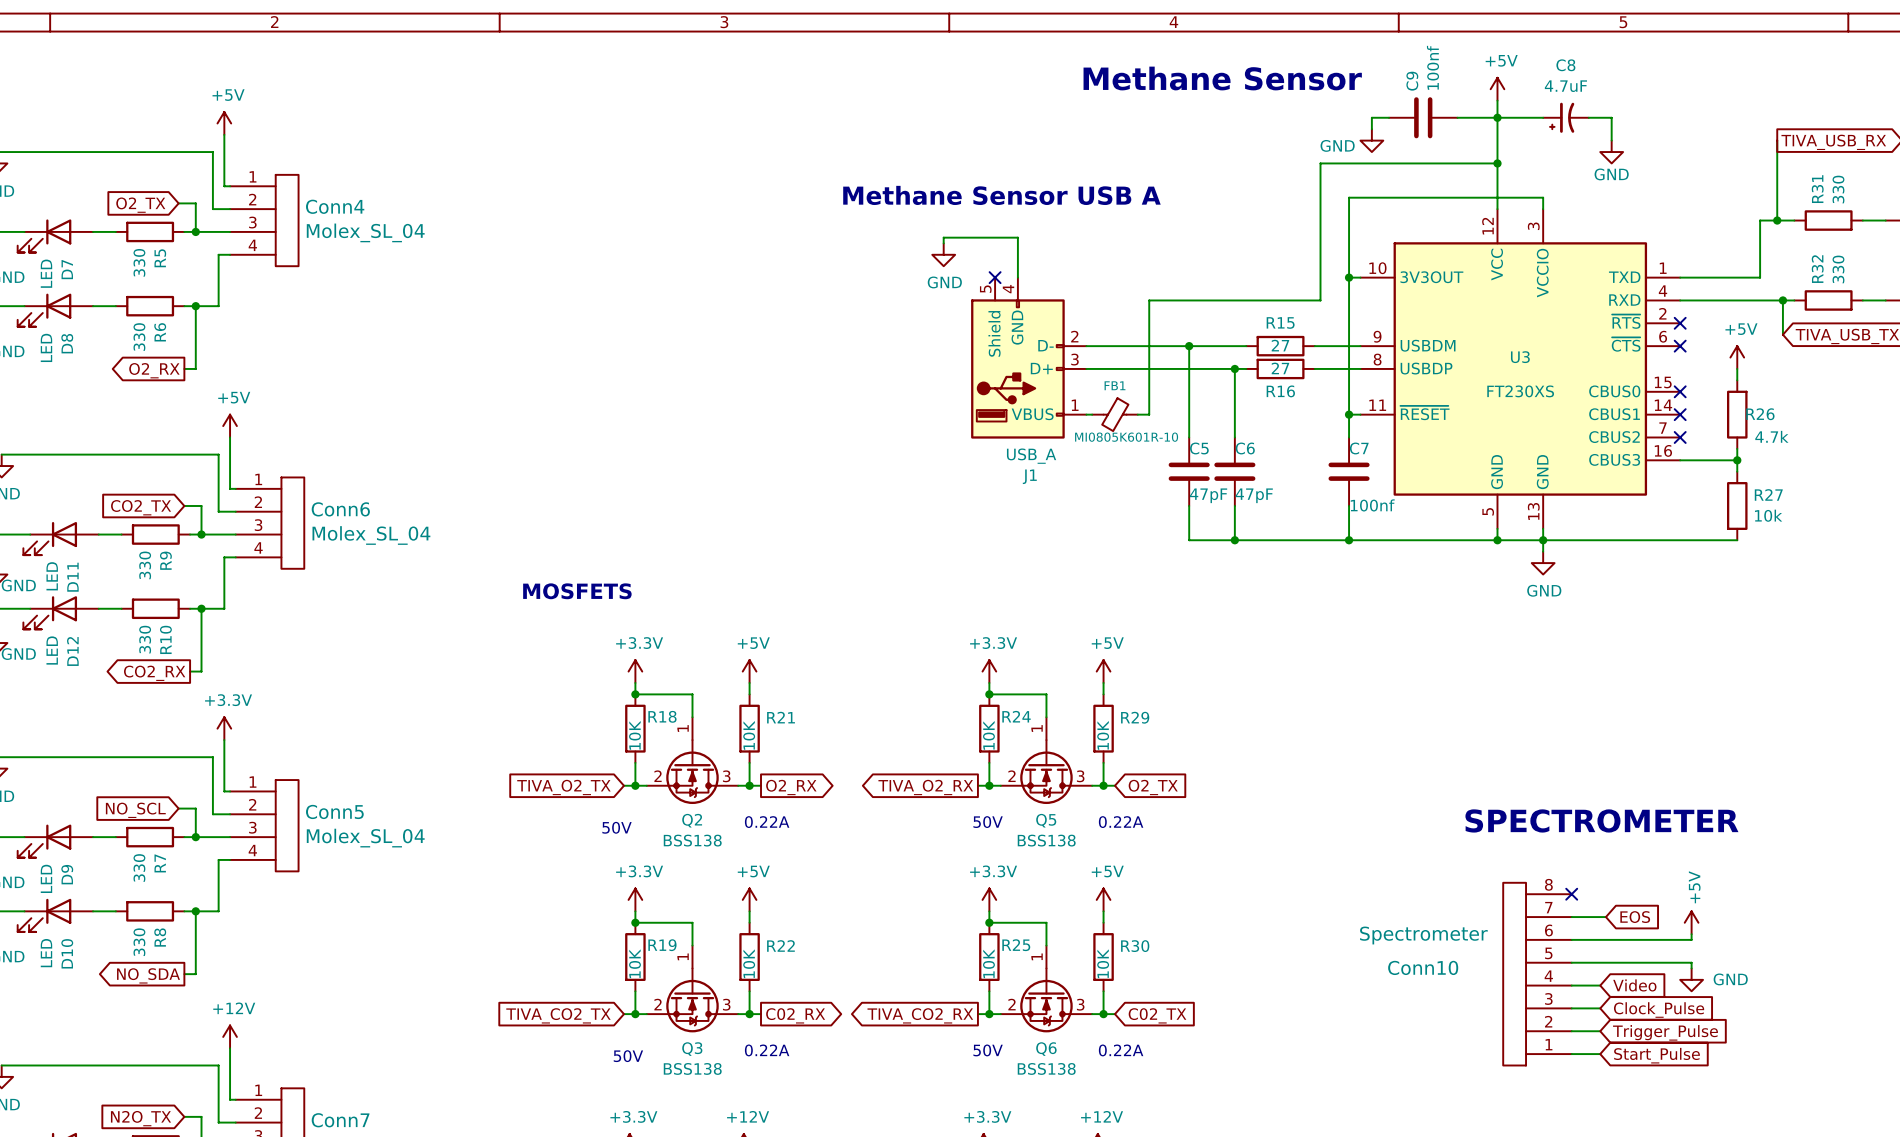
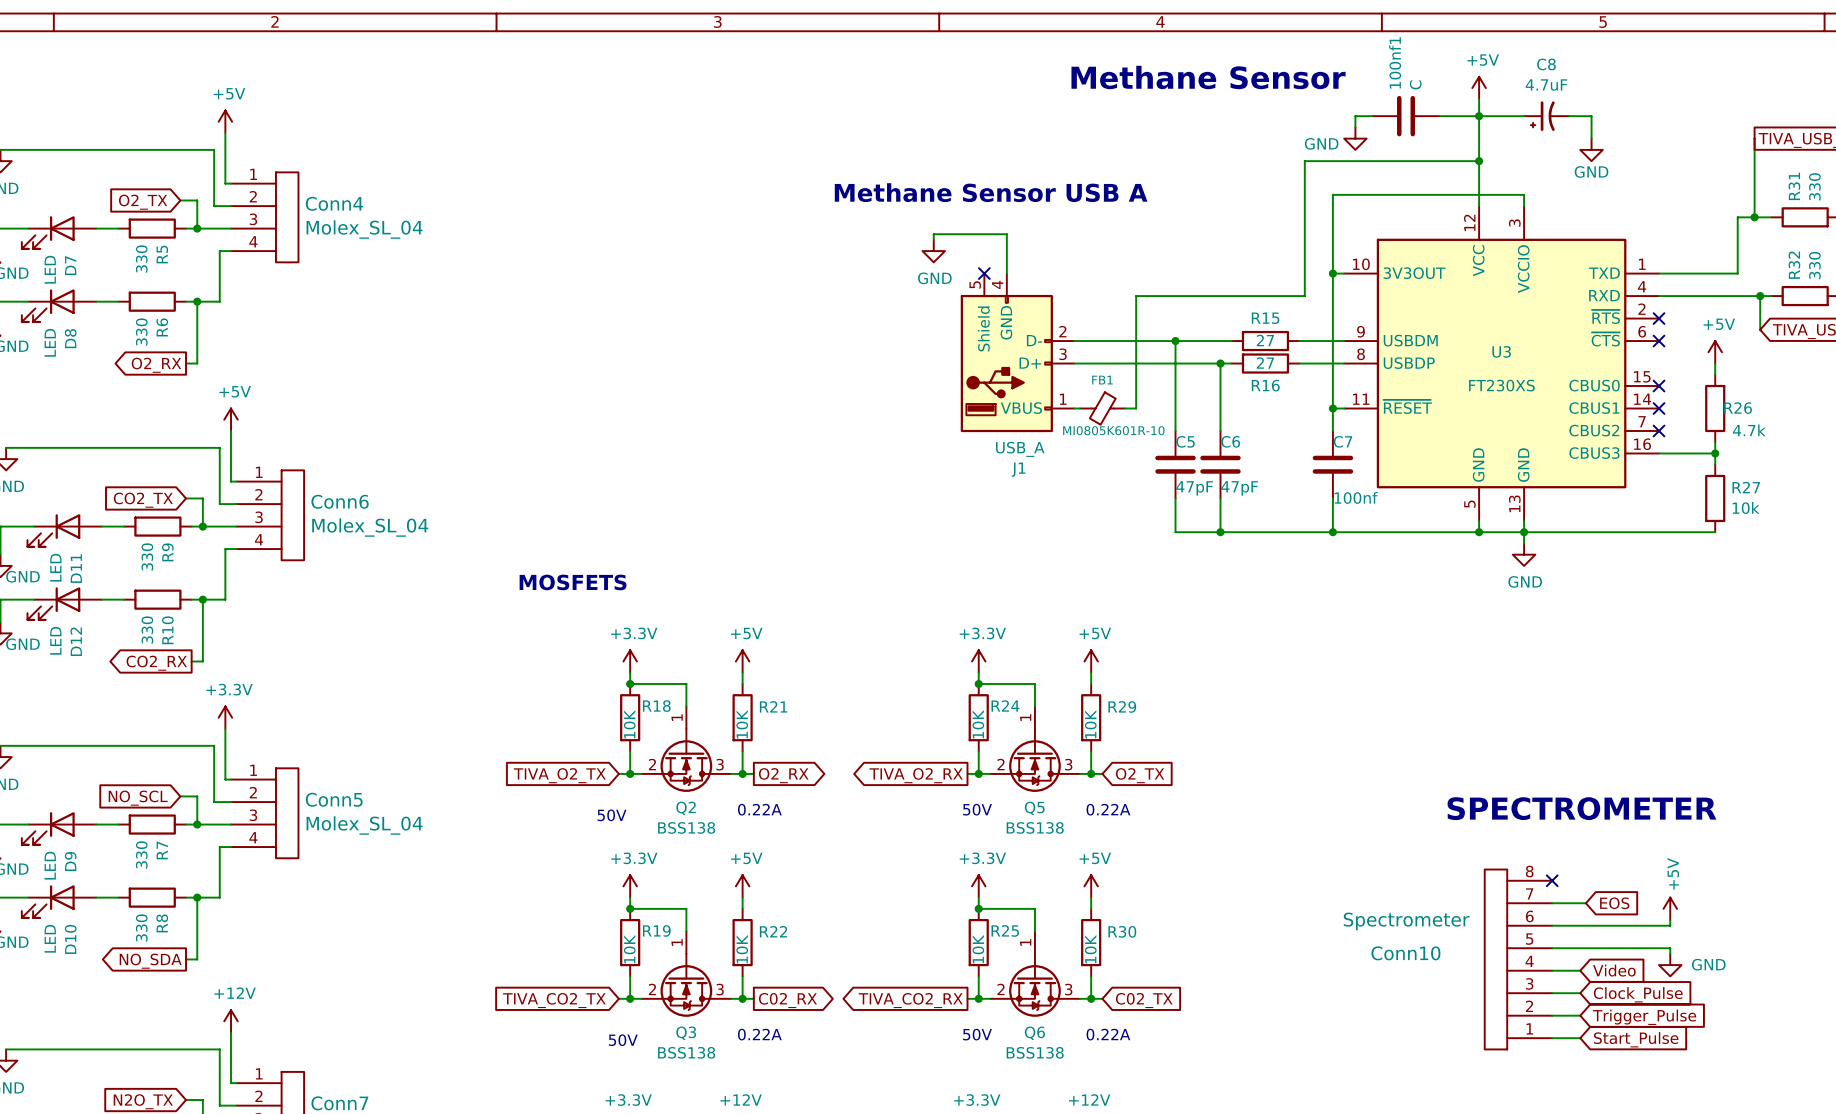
C9 value: 100nf (1432, 67) -> C (1415, 84)
C9 name: C9 (1412, 81) -> 100nf1 (1395, 62)

